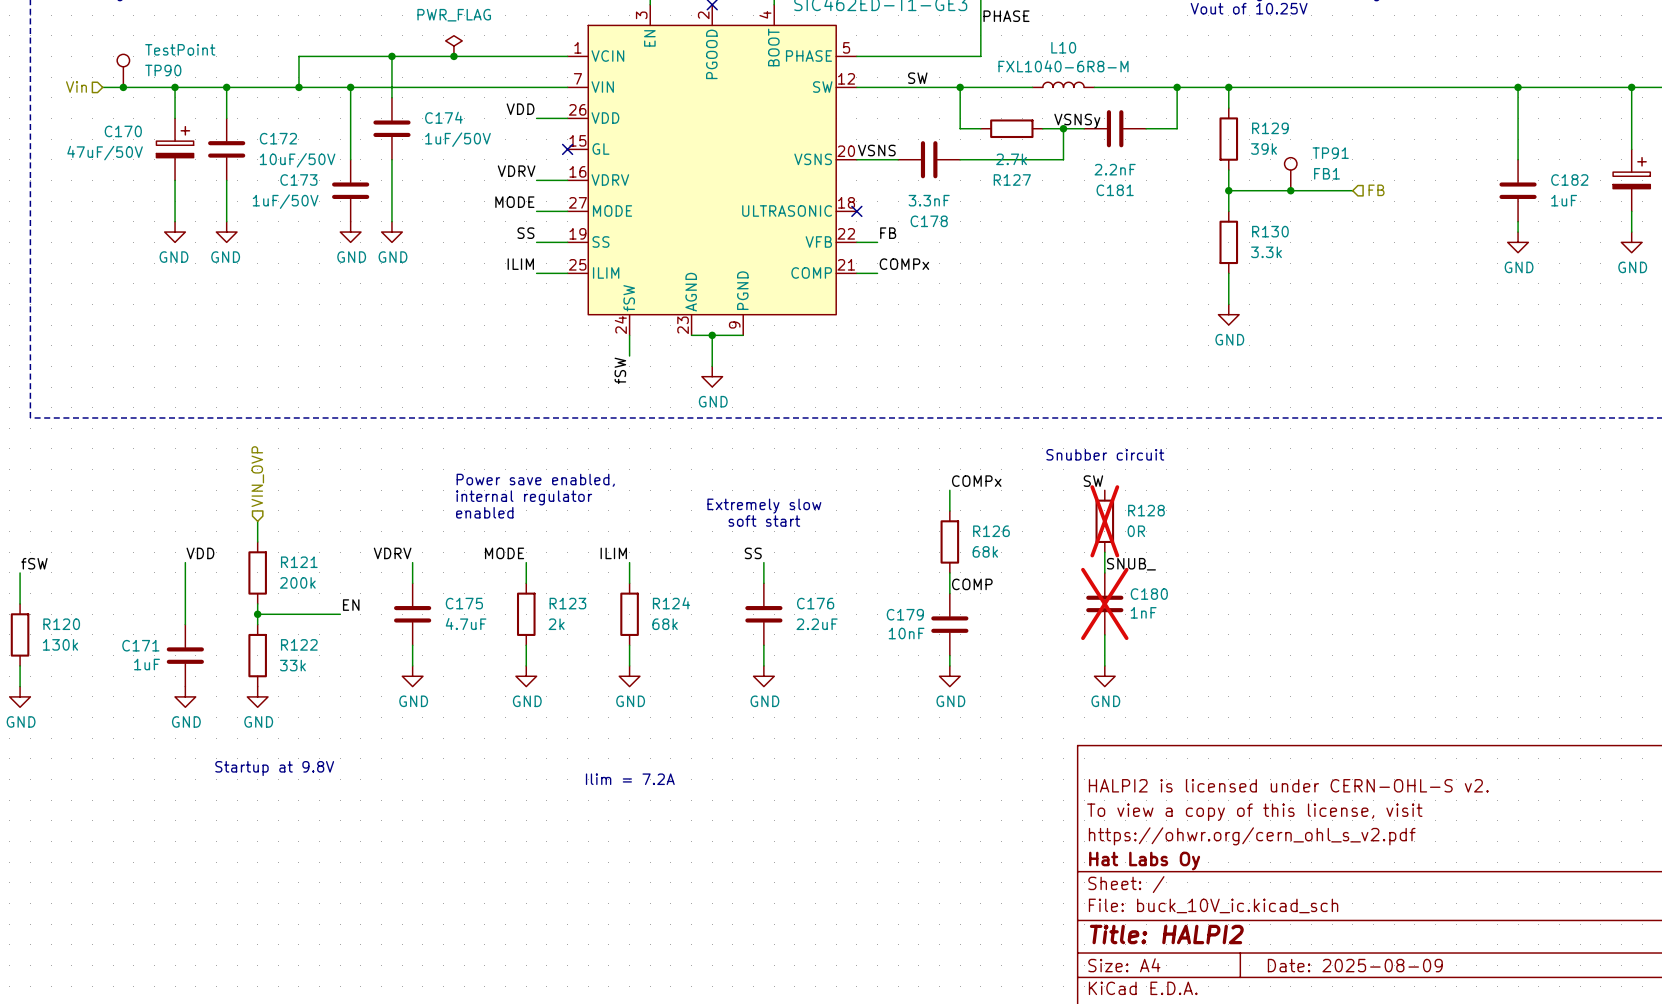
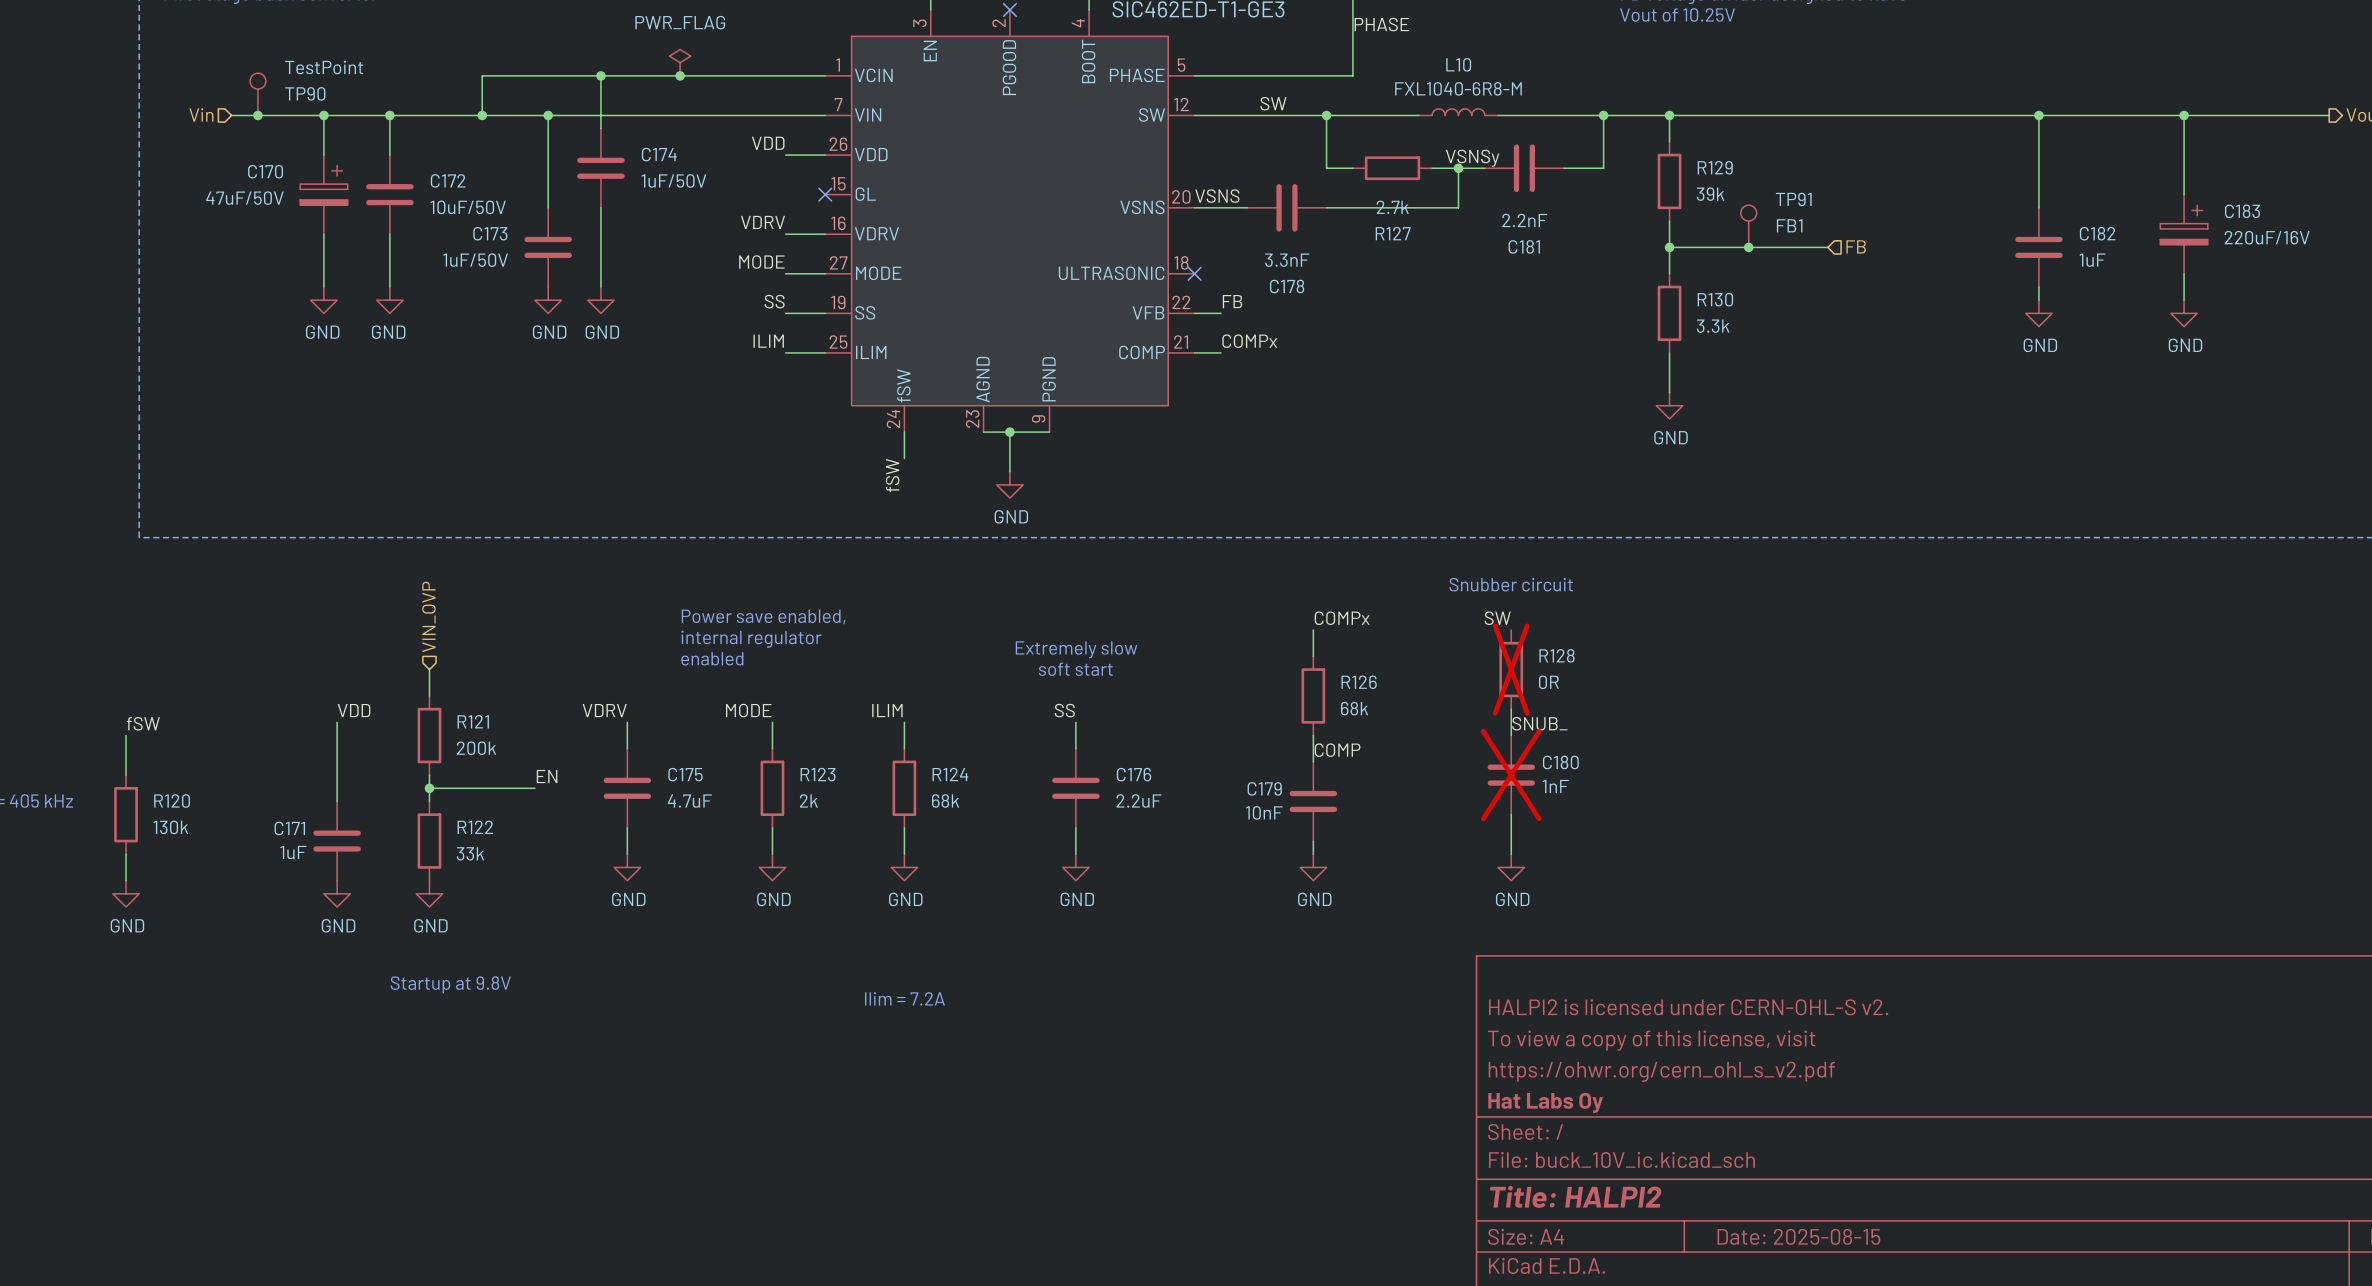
title block: Date: 2025-08-09 (1355, 965) -> Date: 2025-08-15 (1798, 1236)

